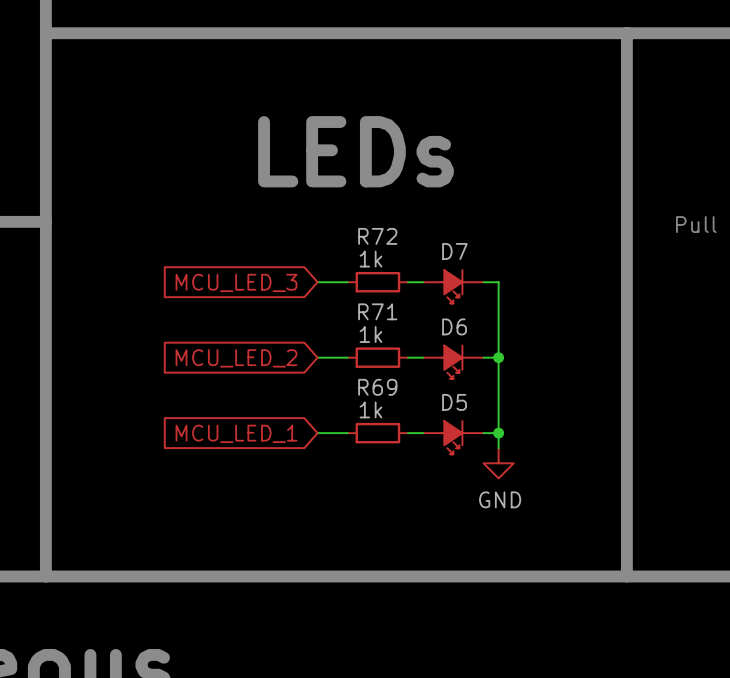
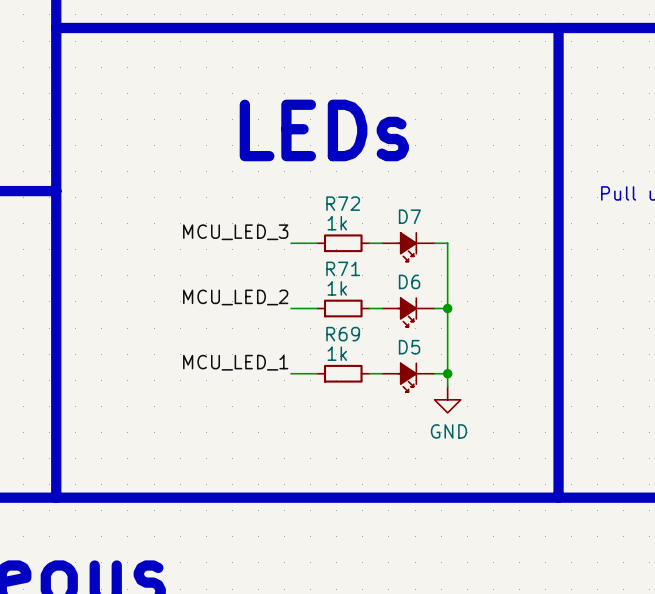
label: none -> MCU_LED_3 (235, 232)
global label: MCU_LED_3 (236, 282) -> none
label: none -> MCU_LED_2 (235, 297)
global label: MCU_LED_2 (236, 358) -> none
label: none -> MCU_LED_1 (235, 362)
global label: MCU_LED_1 (236, 433) -> none

